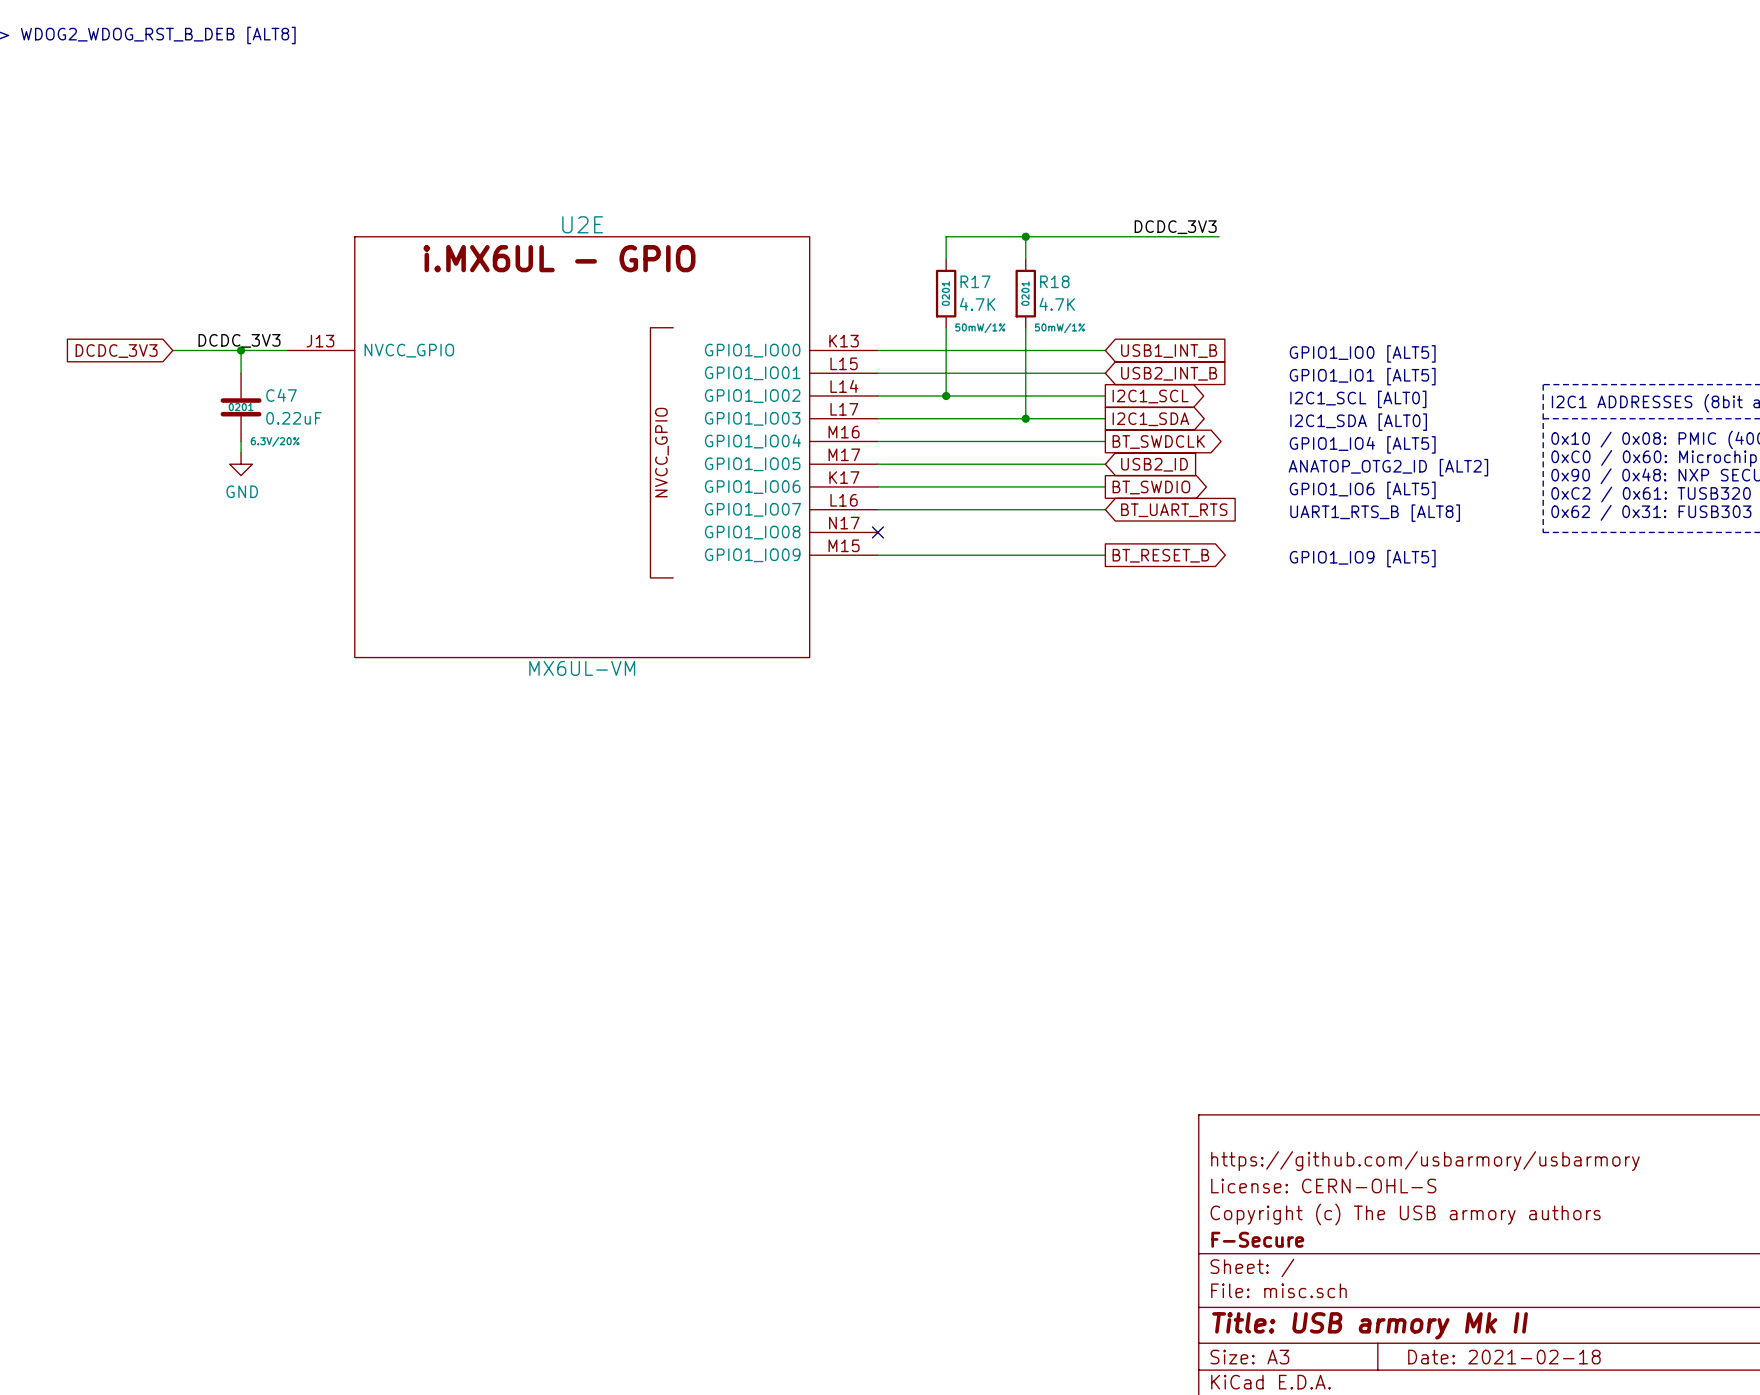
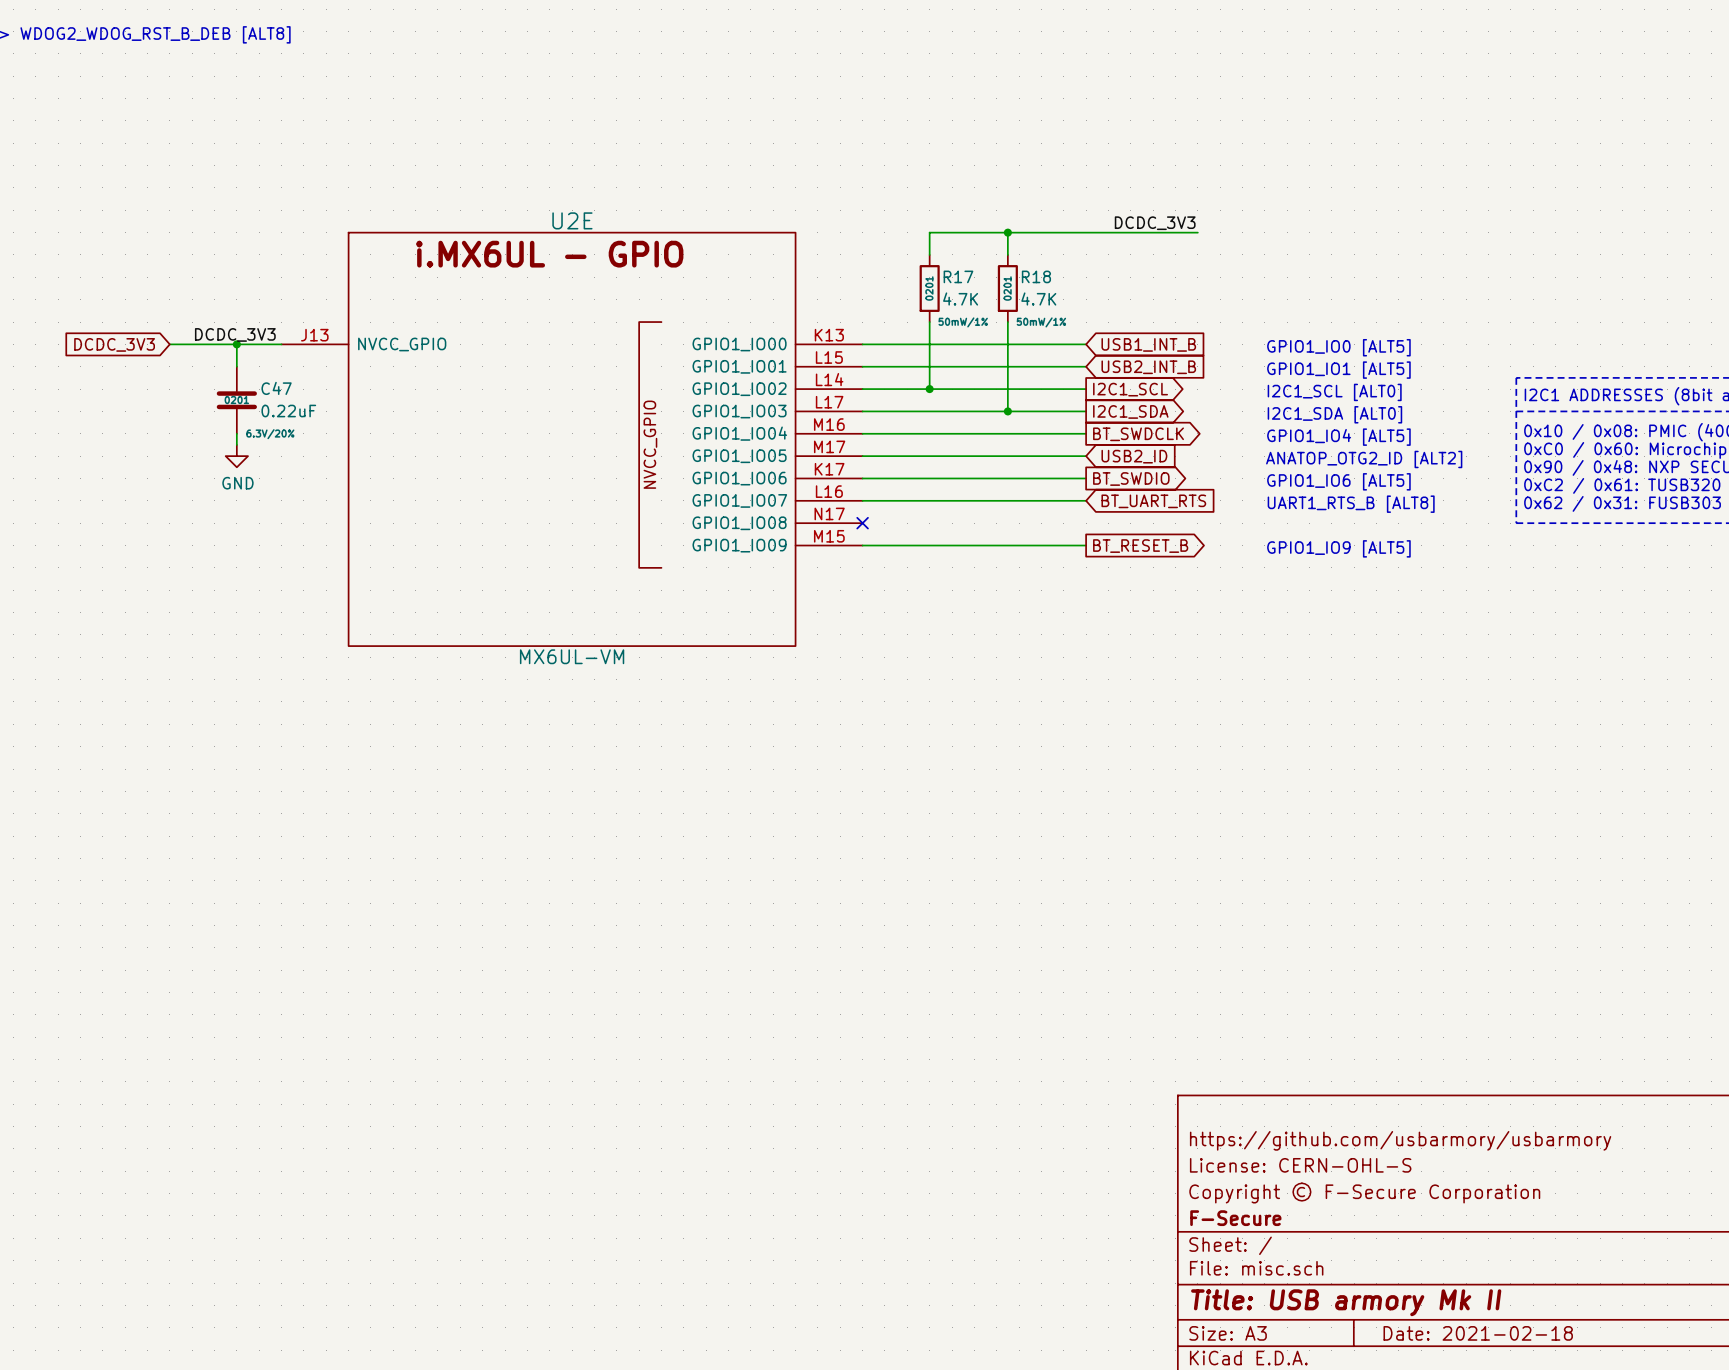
title block: Copyright (c) The USB armory authors (1405, 1214) -> Copyright © F-Secure Corporation (1364, 1193)

